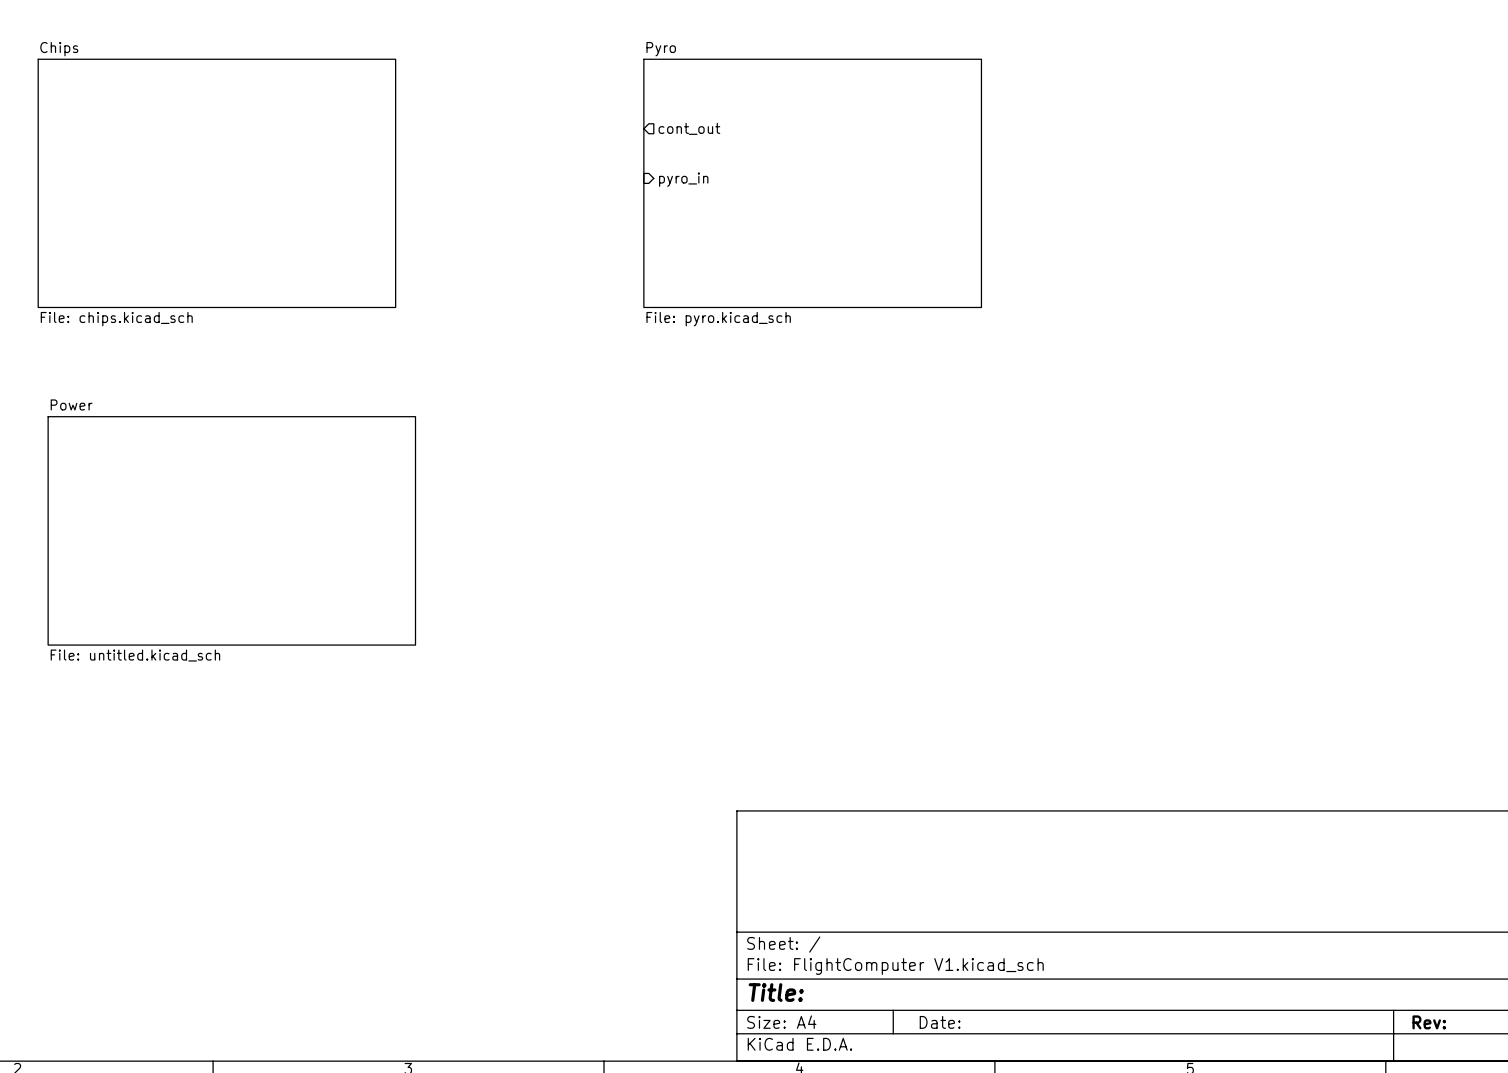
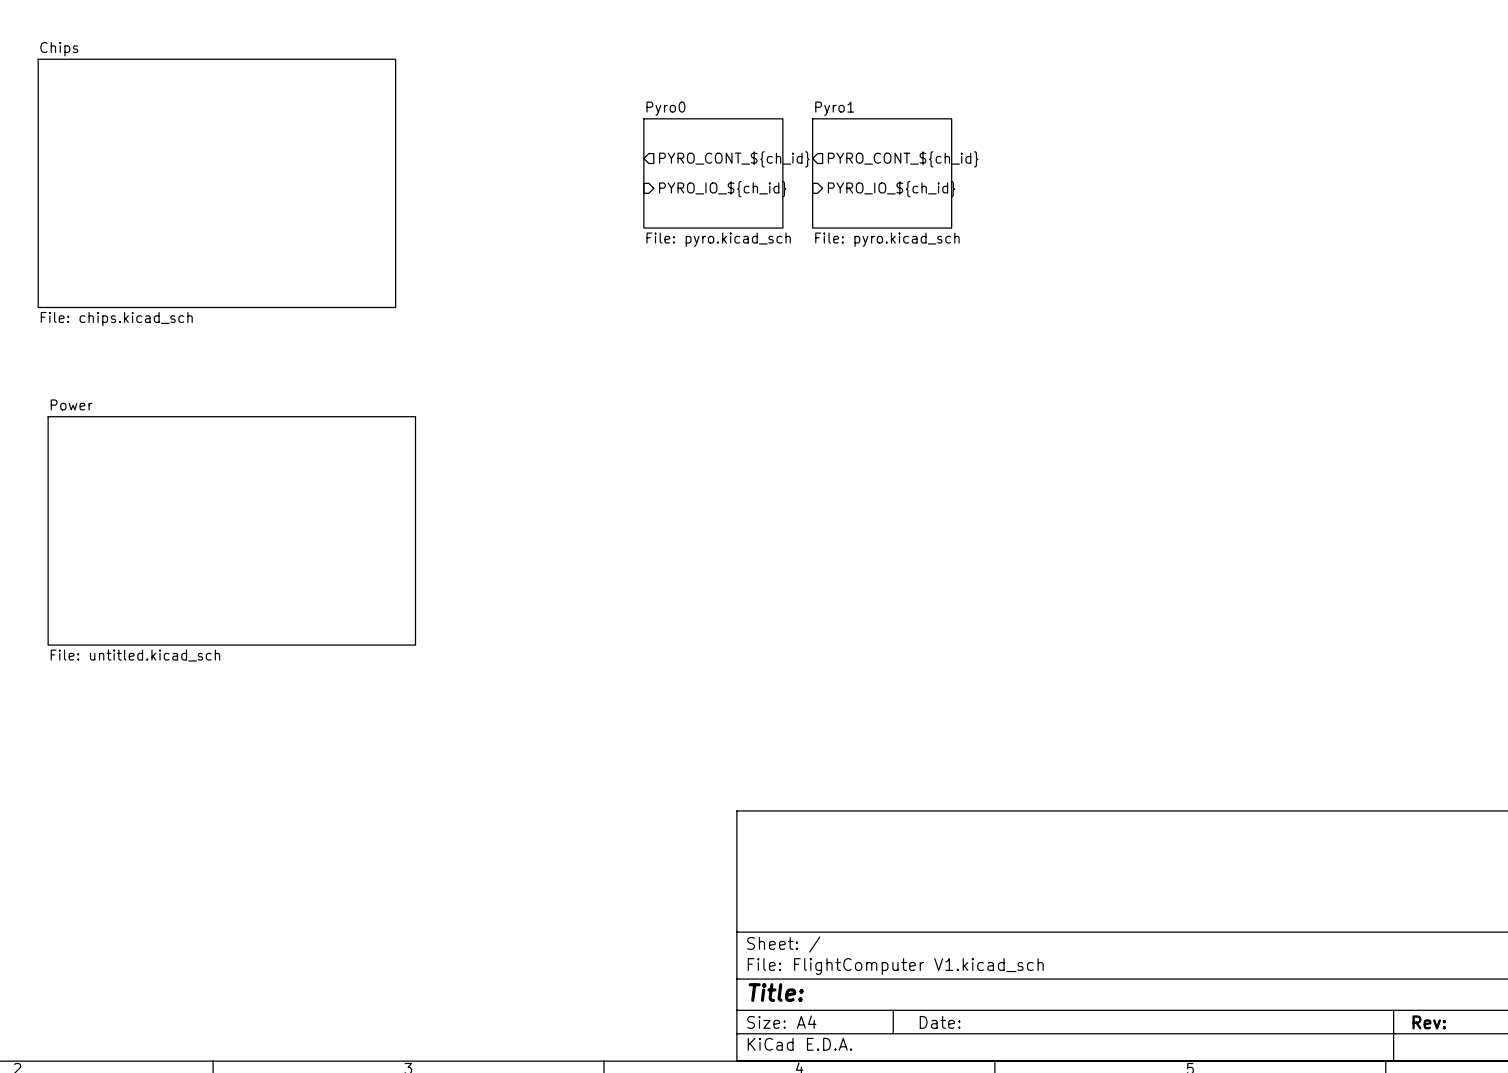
sheet pin: cont_out (689, 128) -> none
sheet pin: none -> PYRO_CONT_${ch_id} (734, 159)
sheet pin: none -> PYRO_CONT_${ch_id} (903, 159)
sheet Pyro0: none -> File: pyro.kicad_sch (713, 173)
sheet Pyro1: none -> File: pyro.kicad_sch (882, 173)
sheet pin: pyro_in (683, 179) -> none
sheet Pyro: File: pyro.kicad_sch (812, 183) -> none
sheet pin: none -> PYRO_IO_${ch_id} (722, 189)
sheet pin: none -> PYRO_IO_${ch_id} (891, 189)

